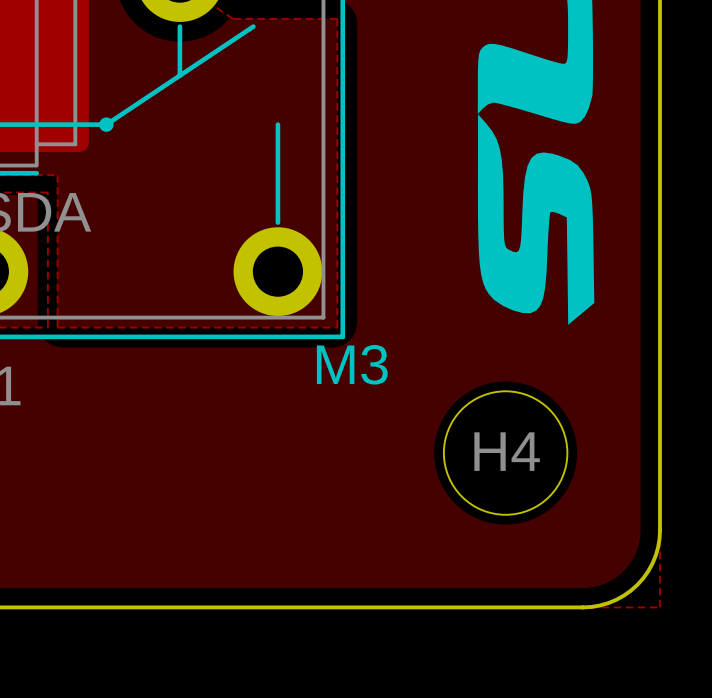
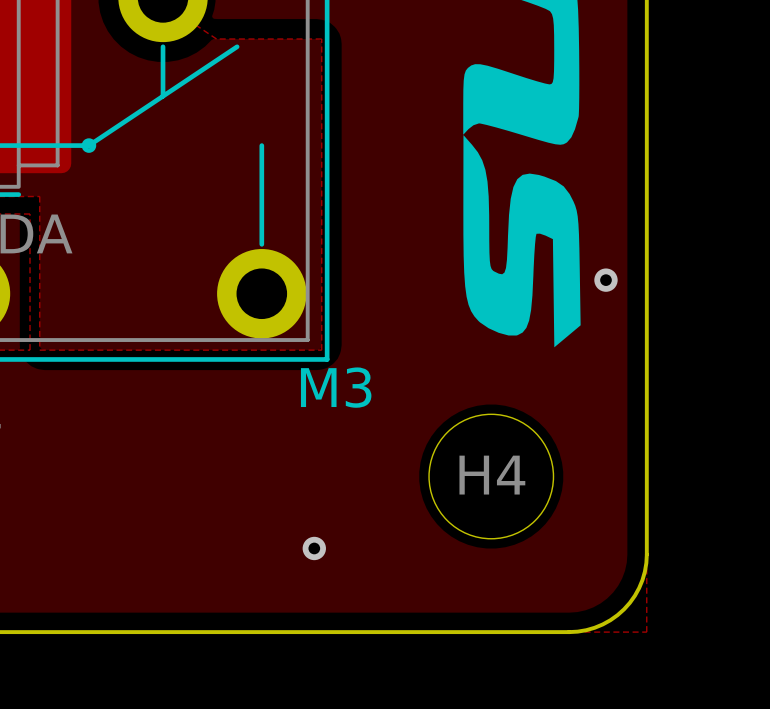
via: none -> (605, 280)
via: none -> (314, 548)

